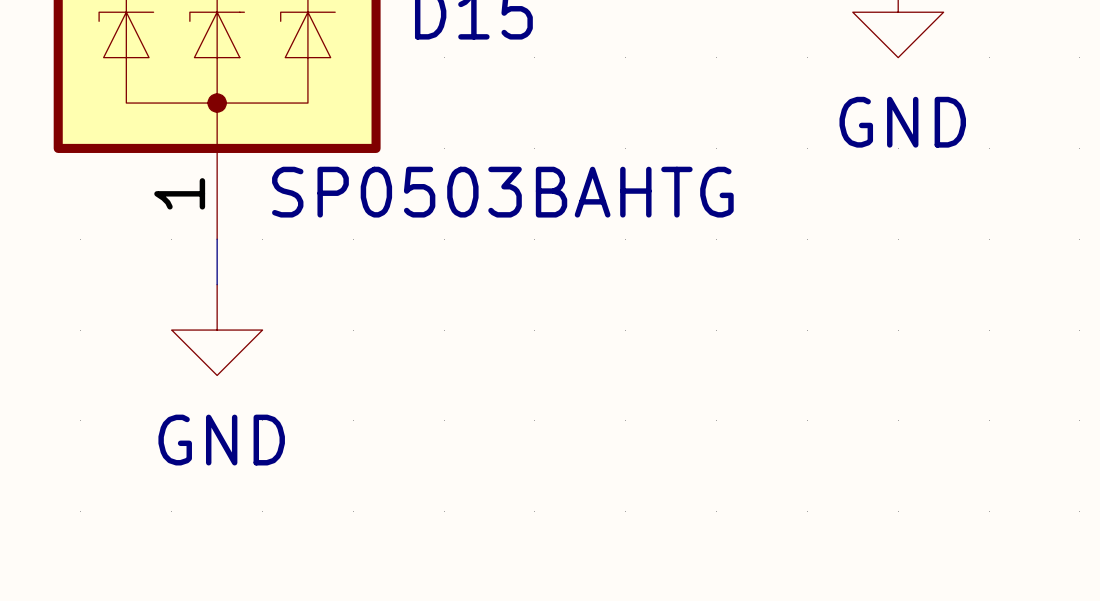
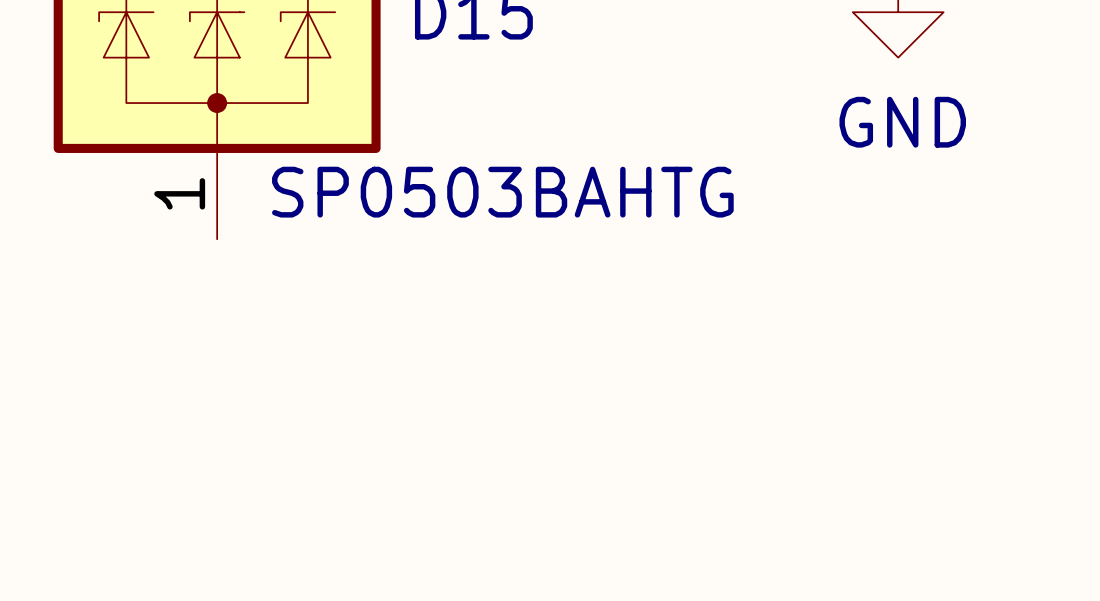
wire: (217, 239) (217, 284) -> none
power symbol: GND (217, 330) -> none

